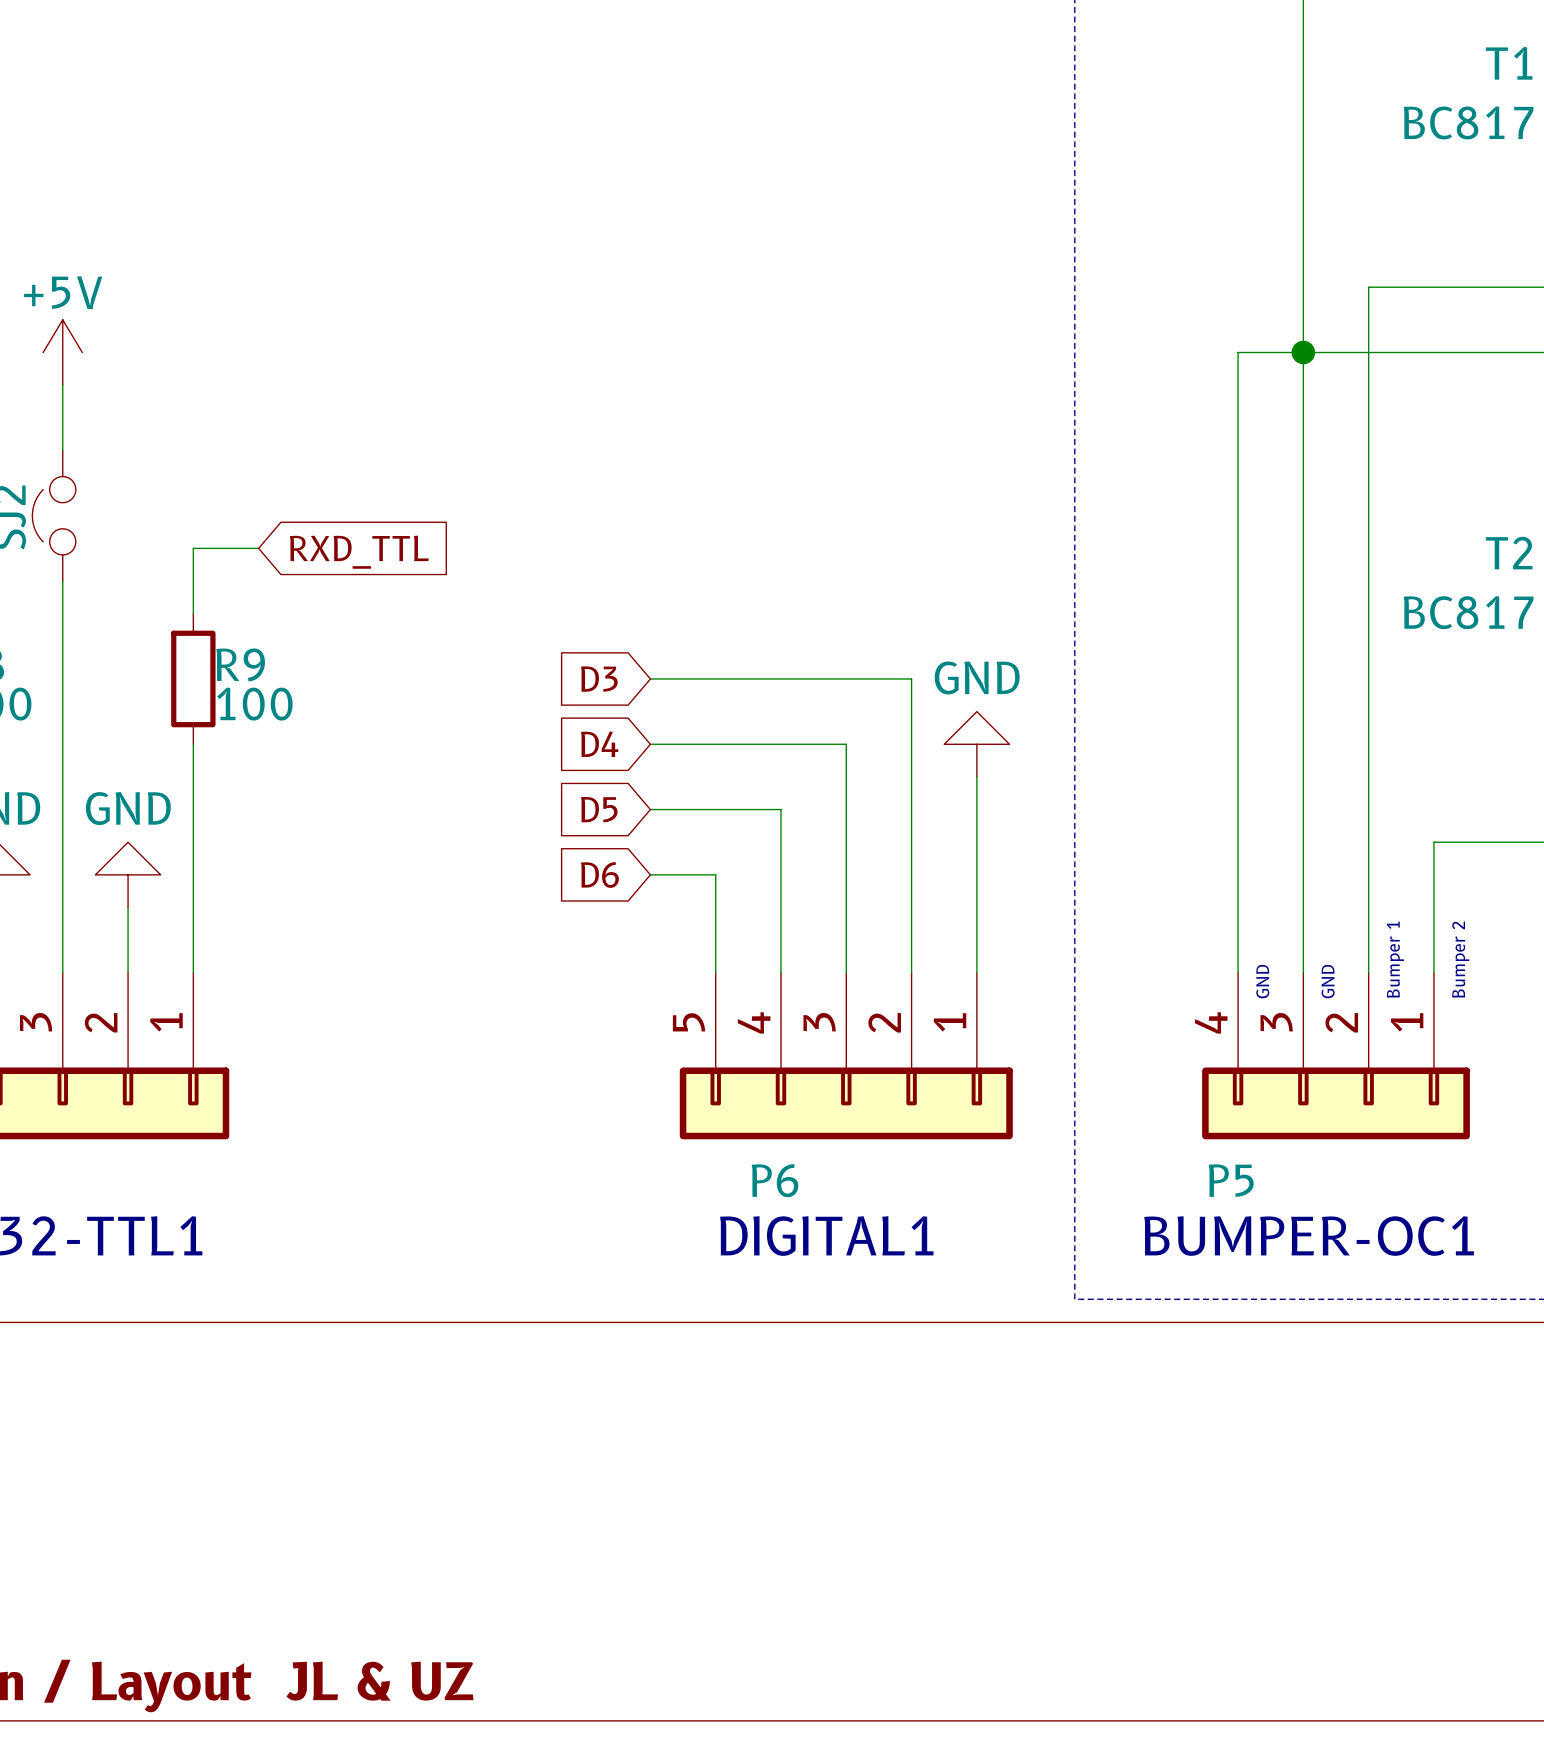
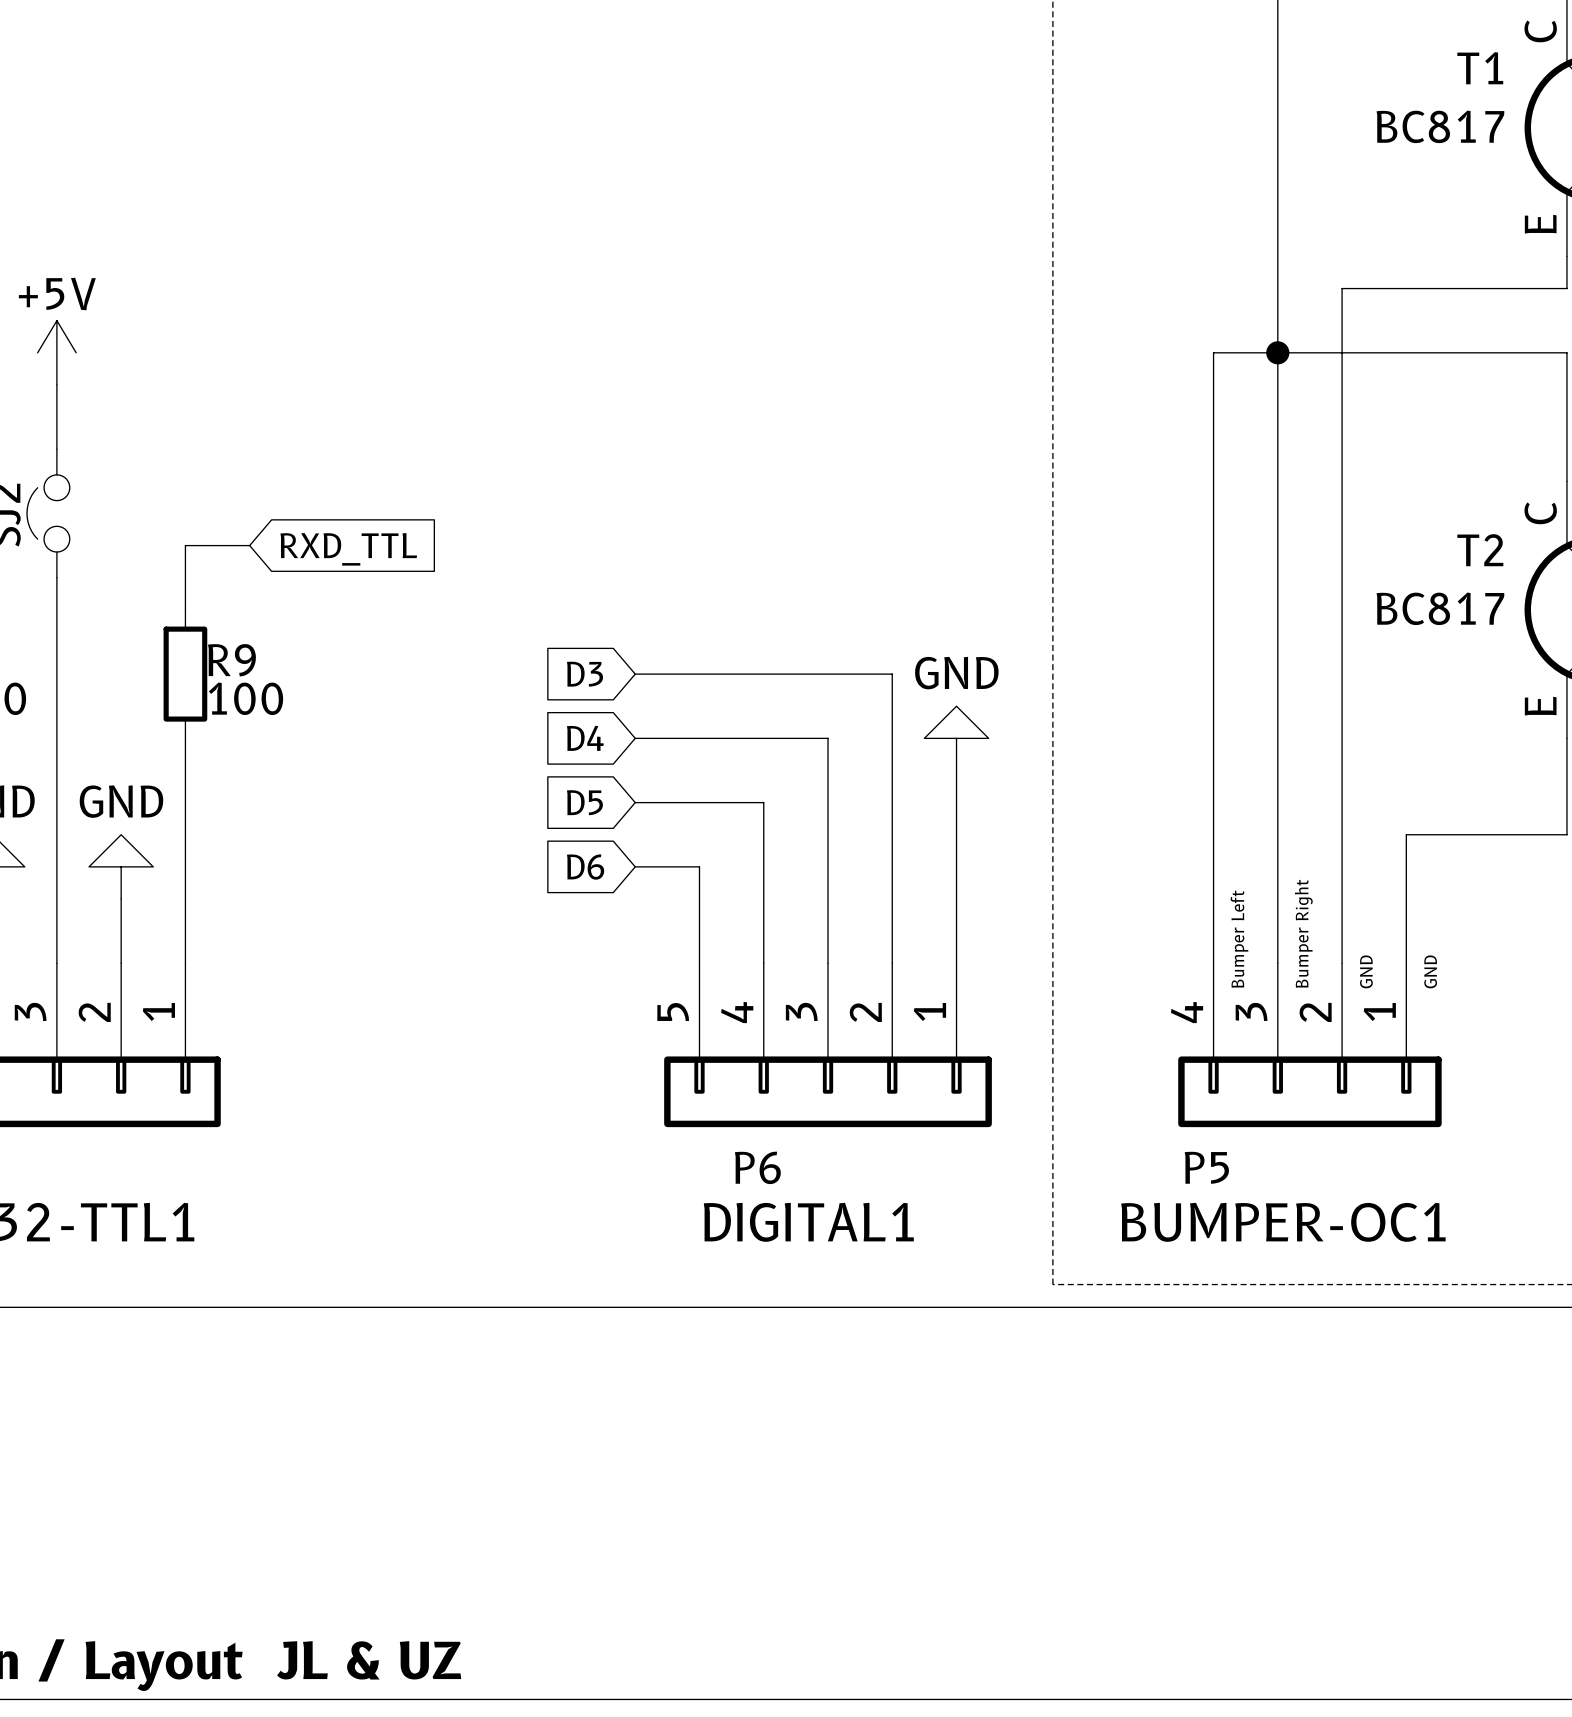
text: Bumper 1 (1395, 959) -> GND (1366, 971)
text: Bumper 2 (1460, 959) -> GND (1430, 971)
text: GND (1262, 981) -> Bumper Left (1239, 939)
text: GND (1328, 981) -> Bumper Right (1303, 933)

